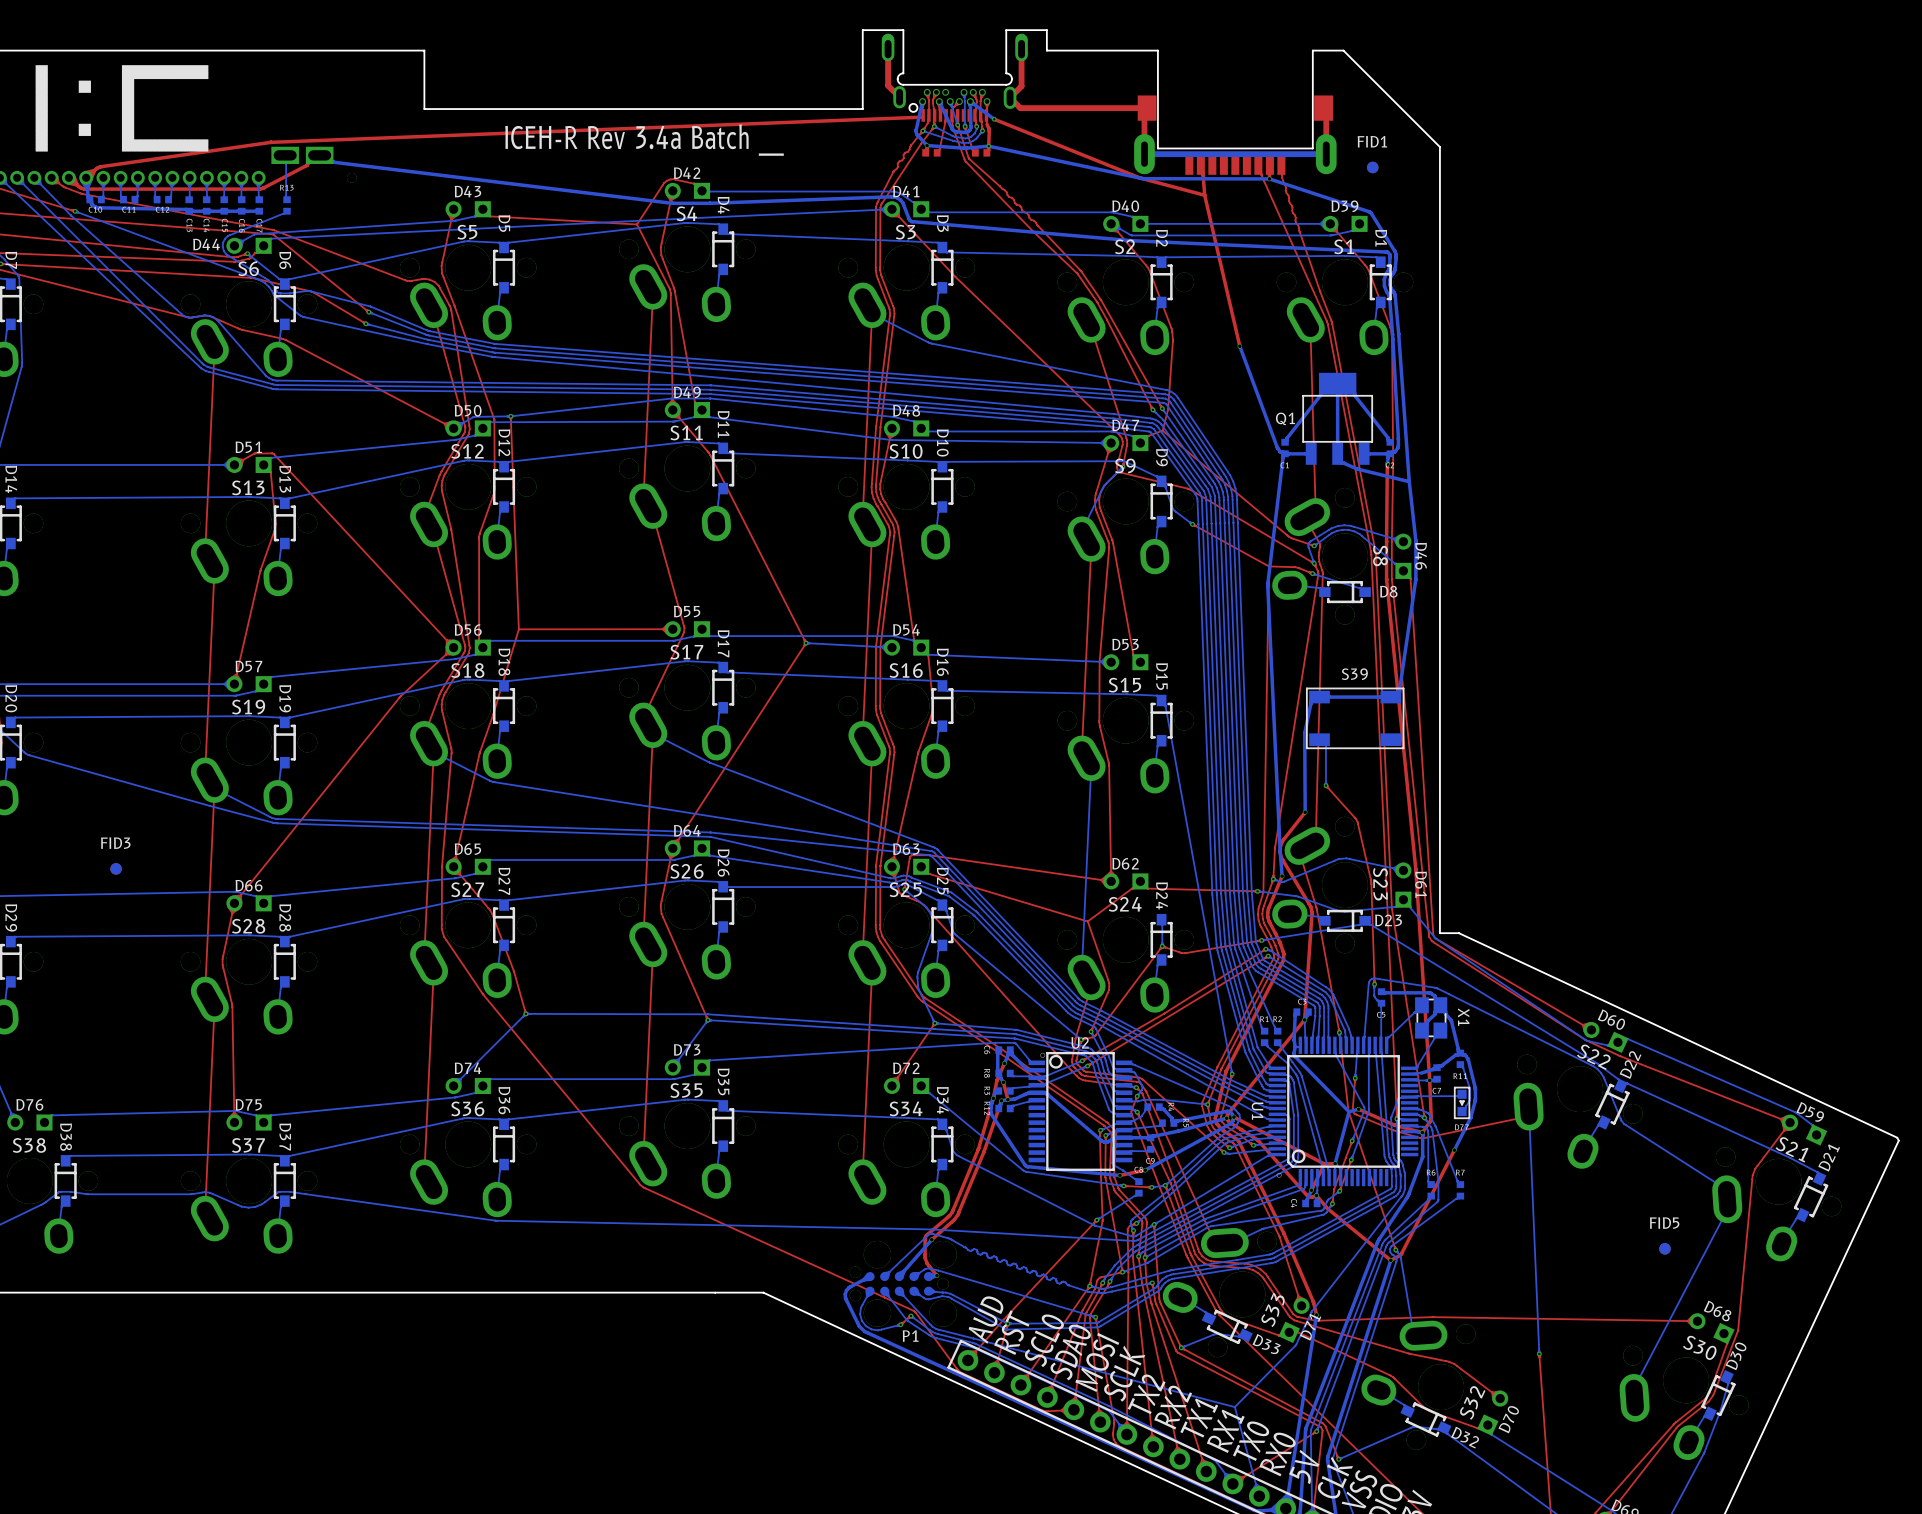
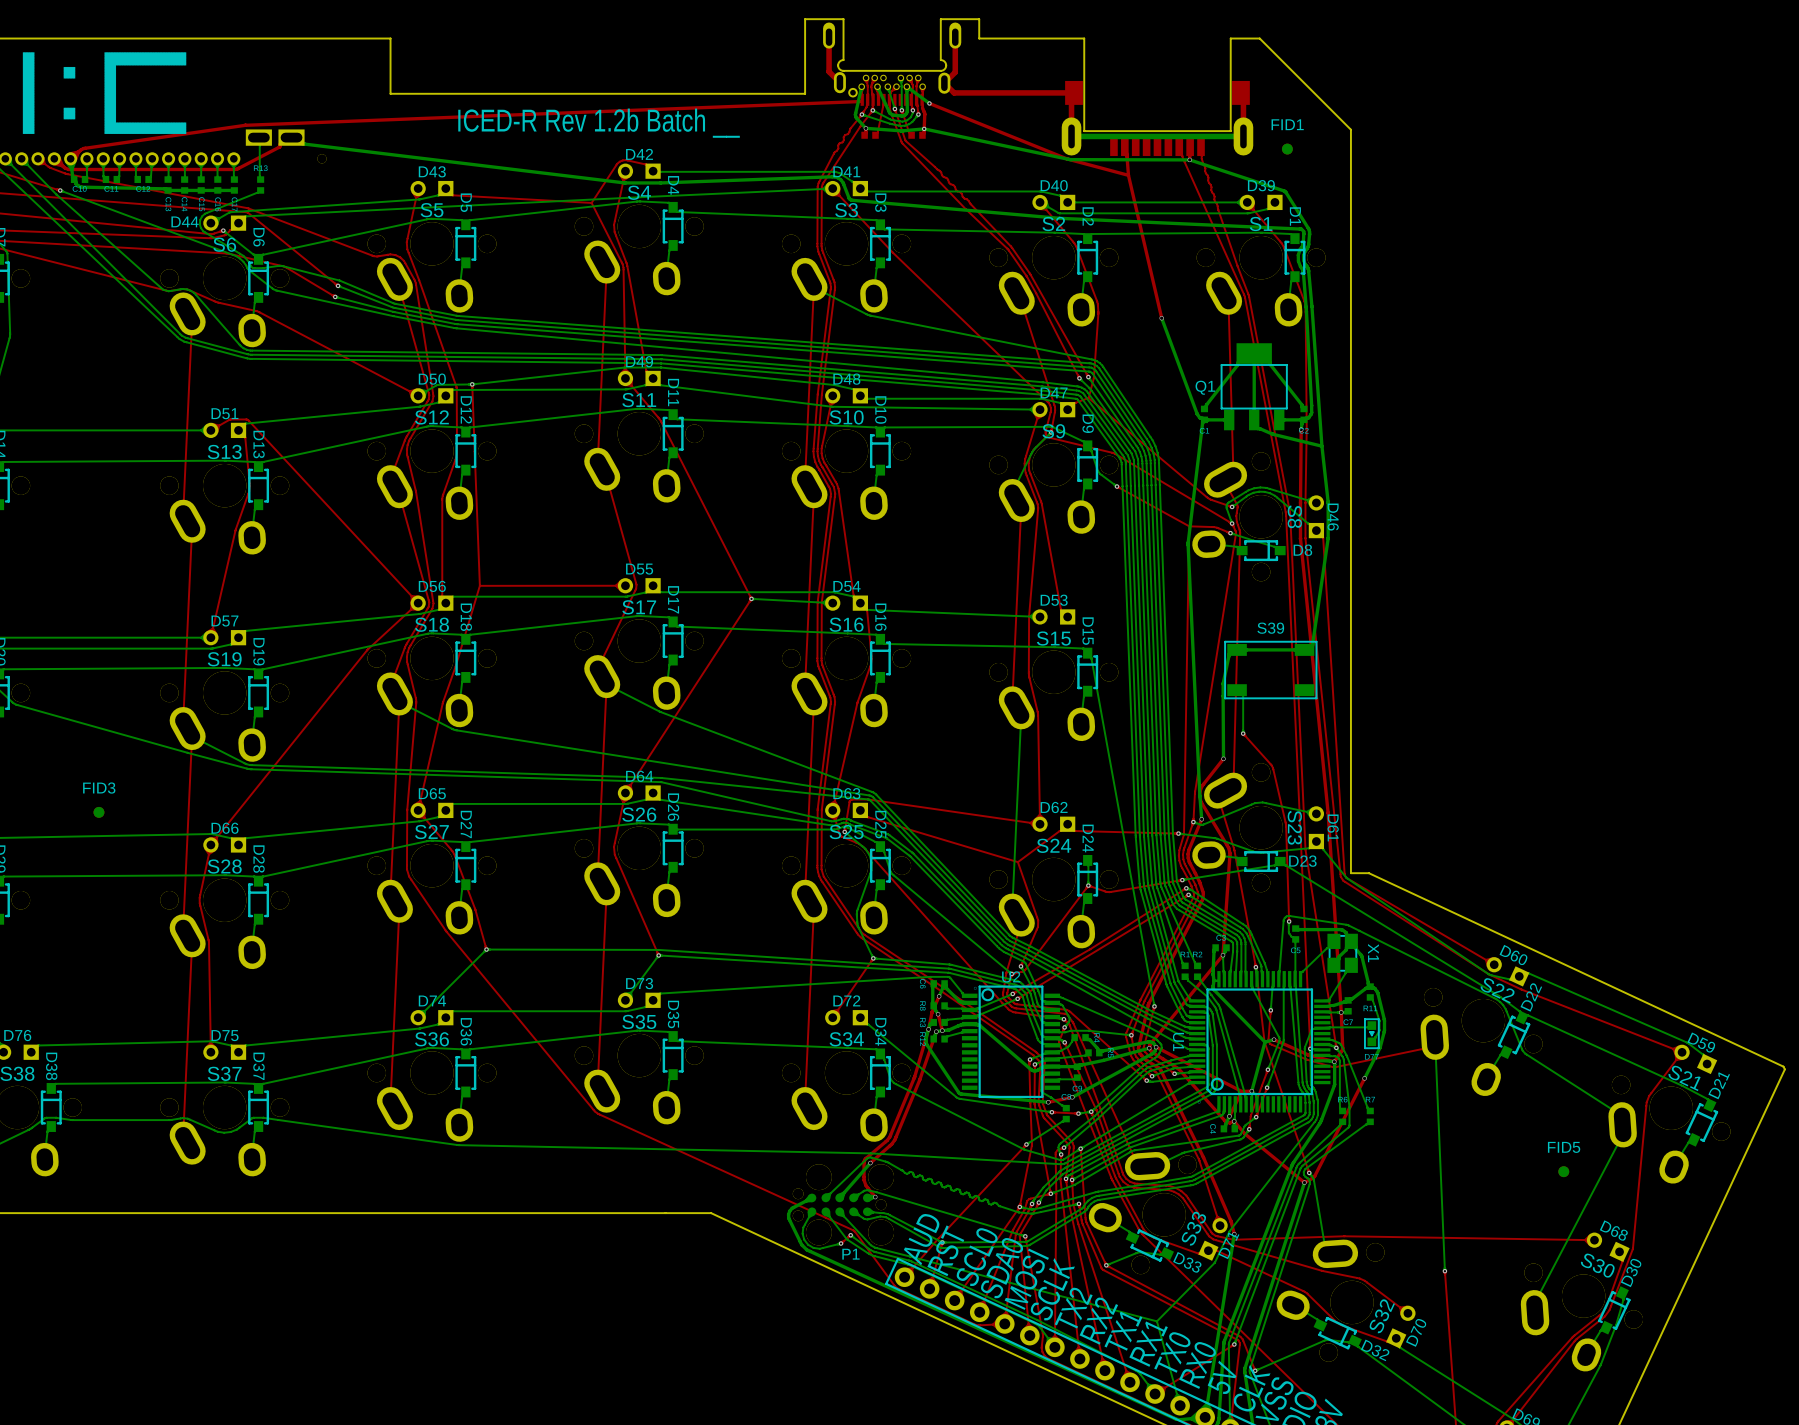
text: ICEH-R Rev 3.4a Batch __ (644, 140) -> ICED-R Rev 1.2b Batch __ (599, 123)

